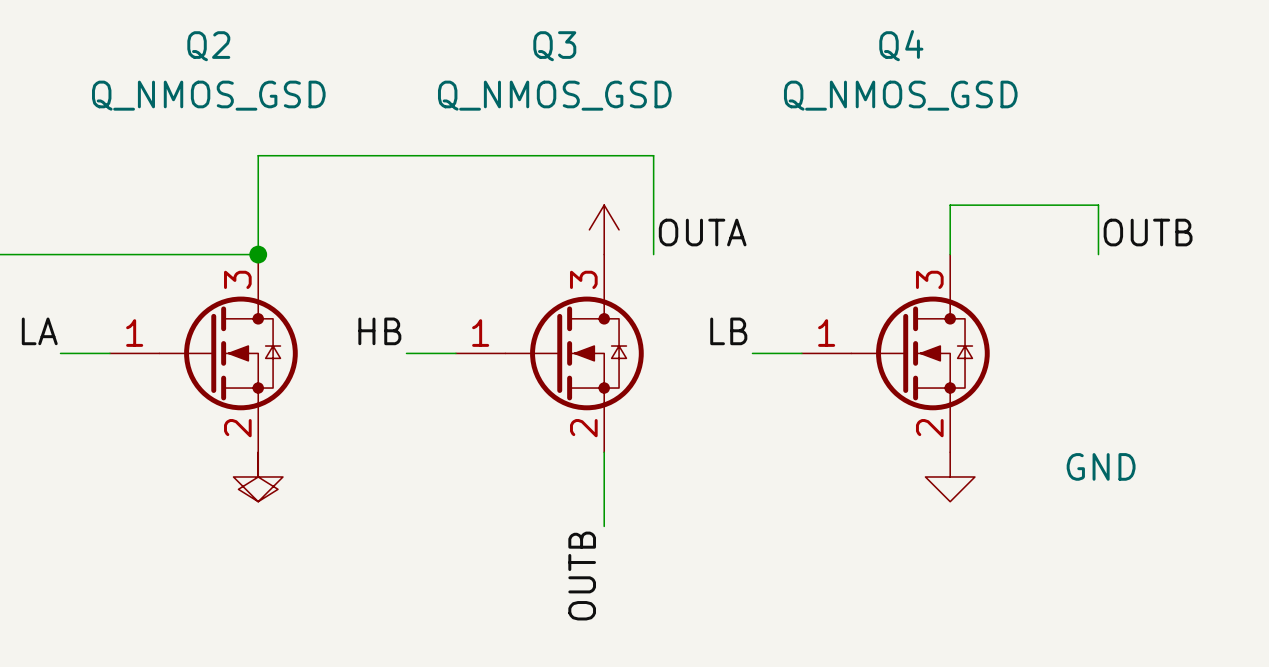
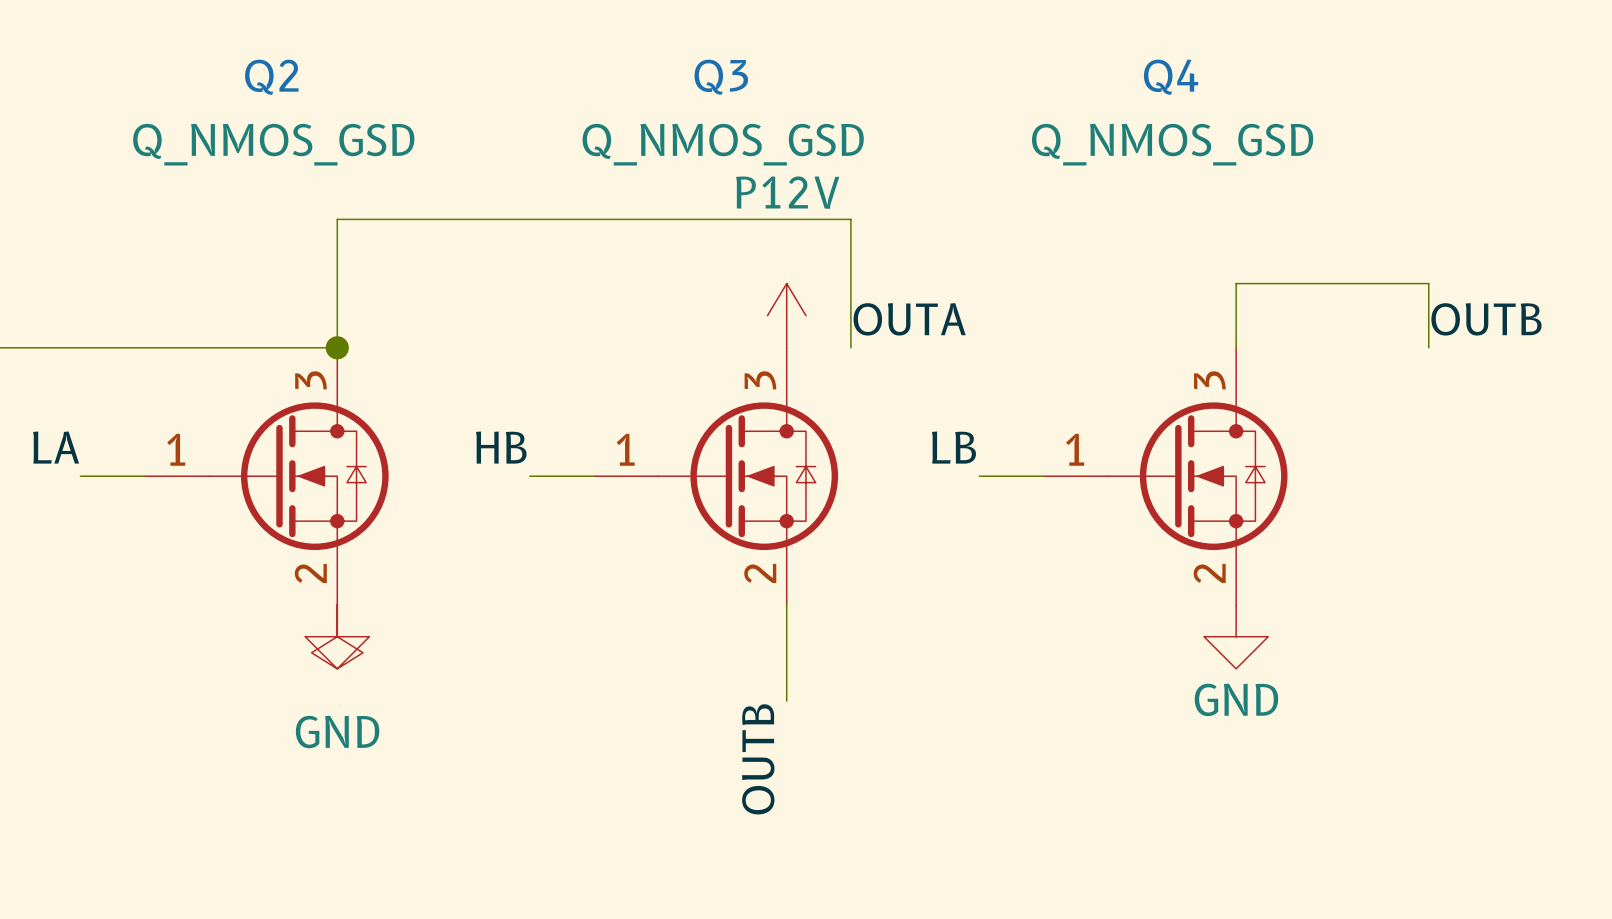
power symbol text: none -> P12V (787, 192)
power symbol text position: GND (1101, 466) -> GND (1236, 699)
power symbol text: none -> GND (337, 732)

